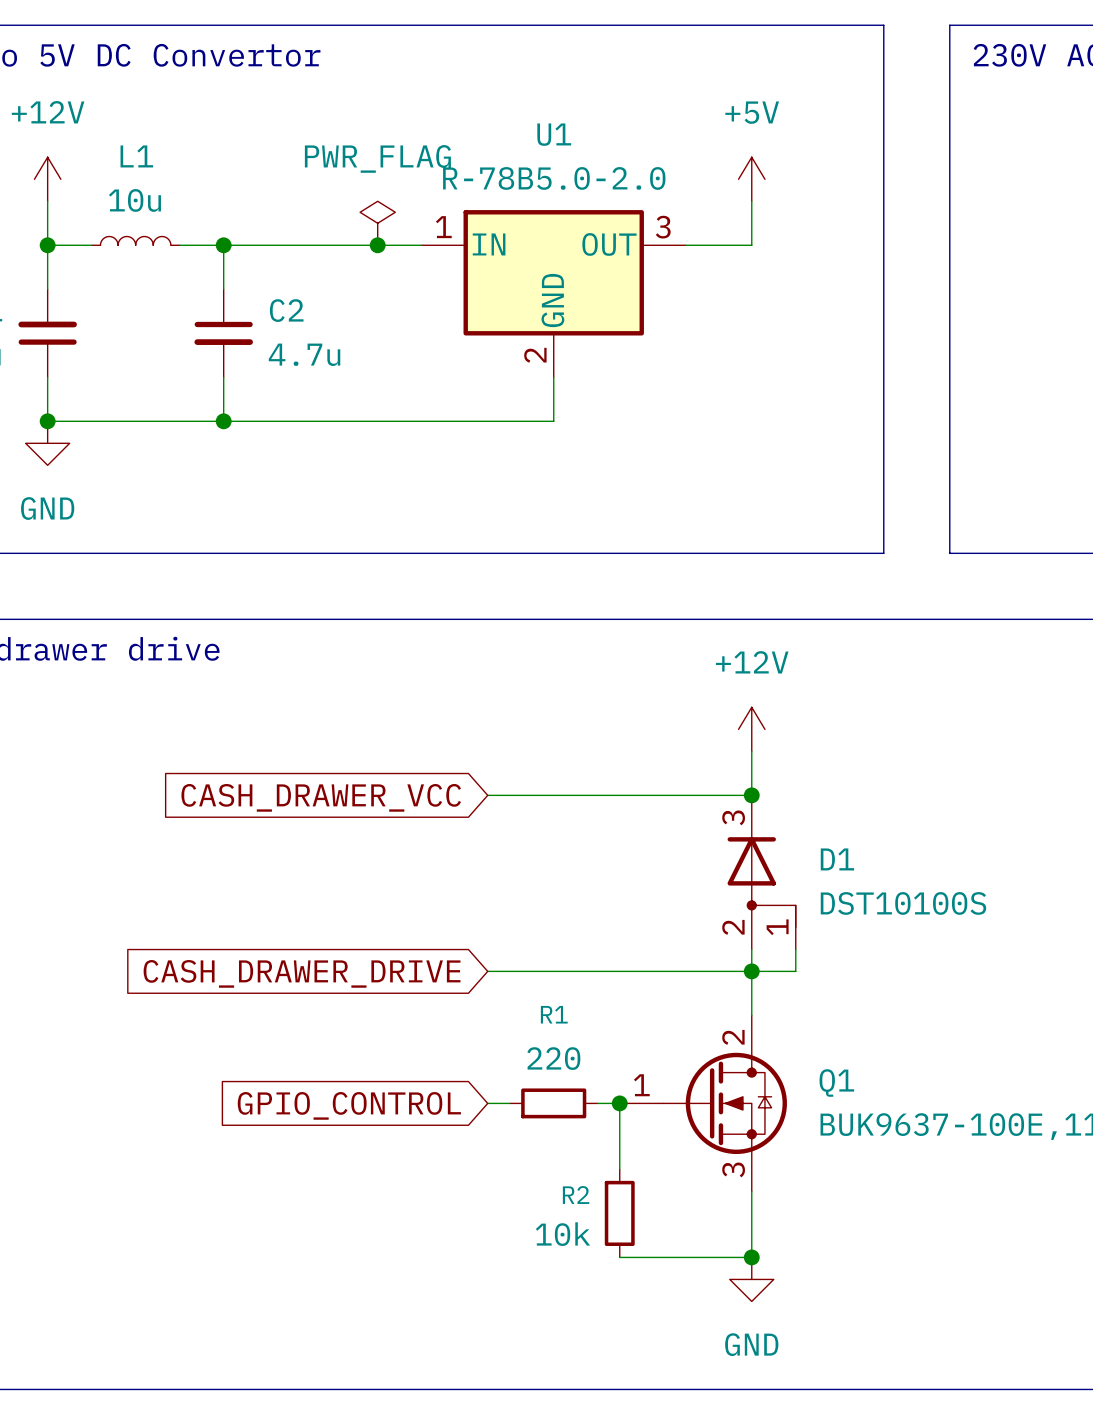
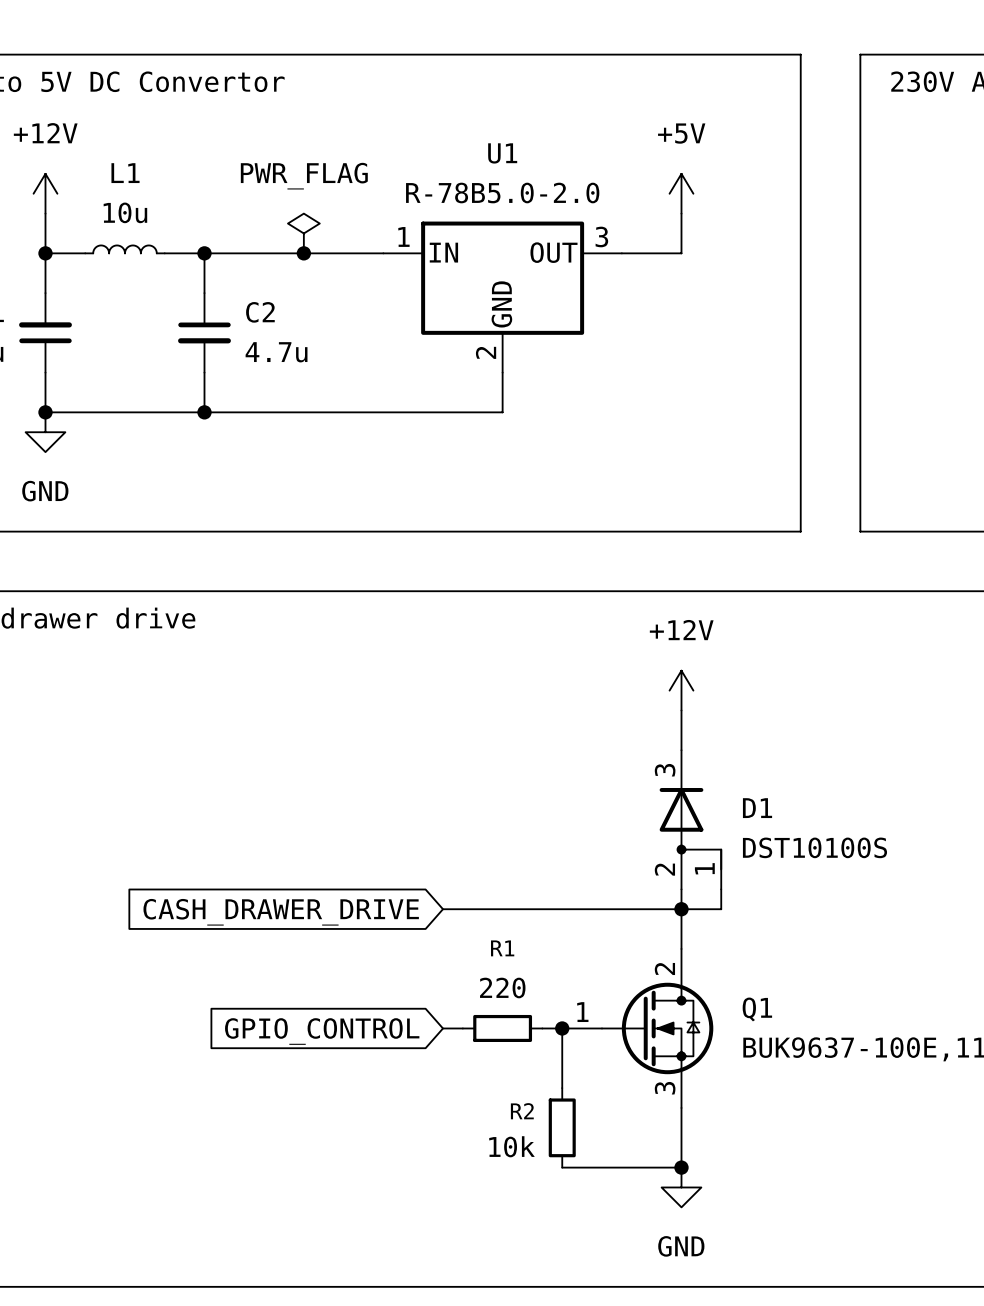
power symbol position: PWR_FLAG (377, 223) -> PWR_FLAG (303, 233)
junction position: (377, 245) -> (303, 253)
wire: (487, 795) (751, 795) -> none
junction: (751, 795) -> none
global label: CASH_DRAWER_VCC (321, 797) -> none

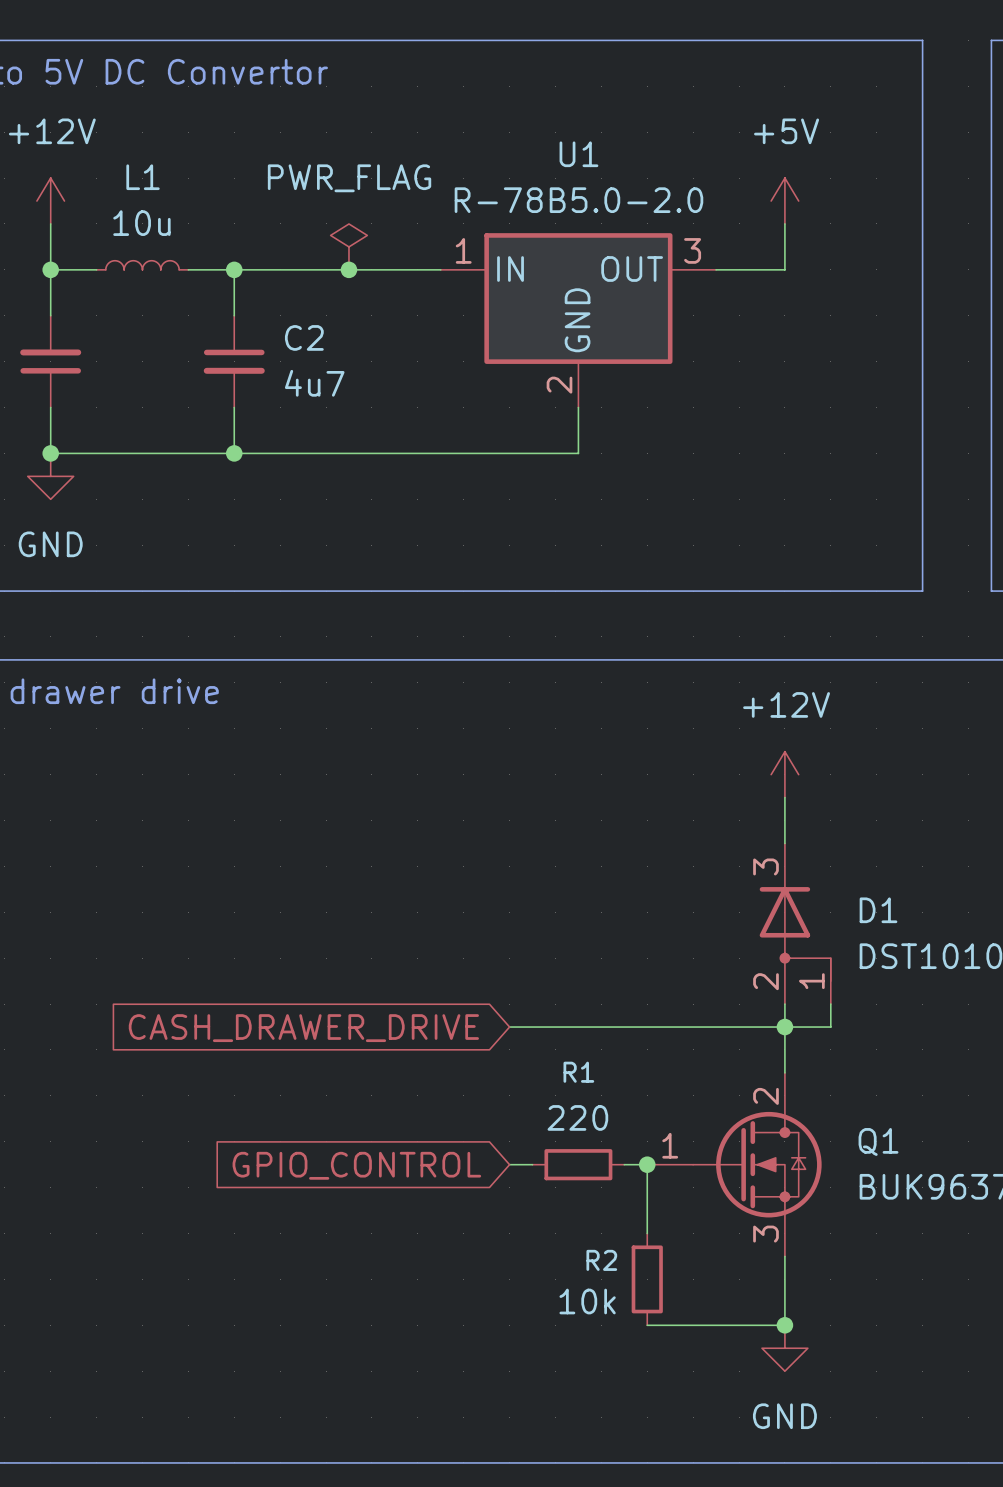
C2 value: 4.7u (276, 352) -> 4u7 (314, 383)

